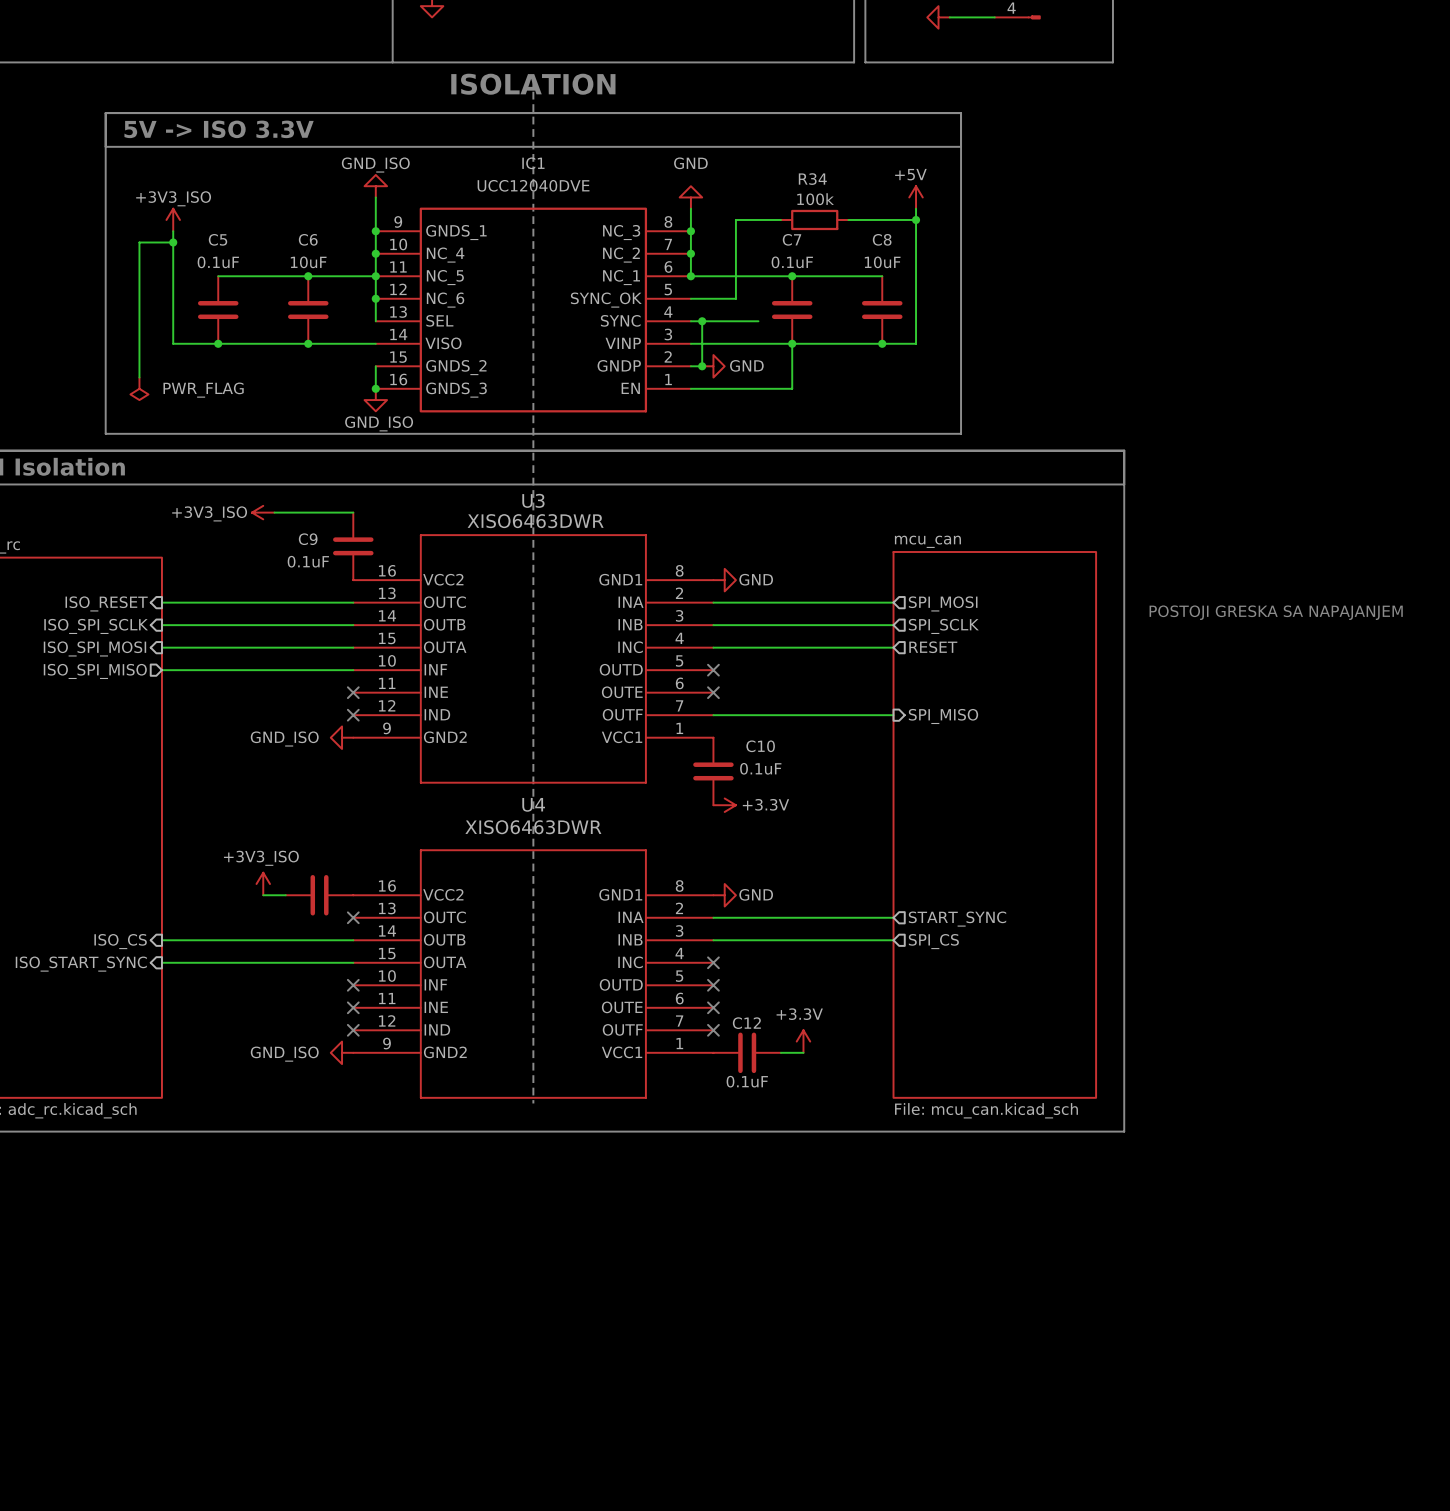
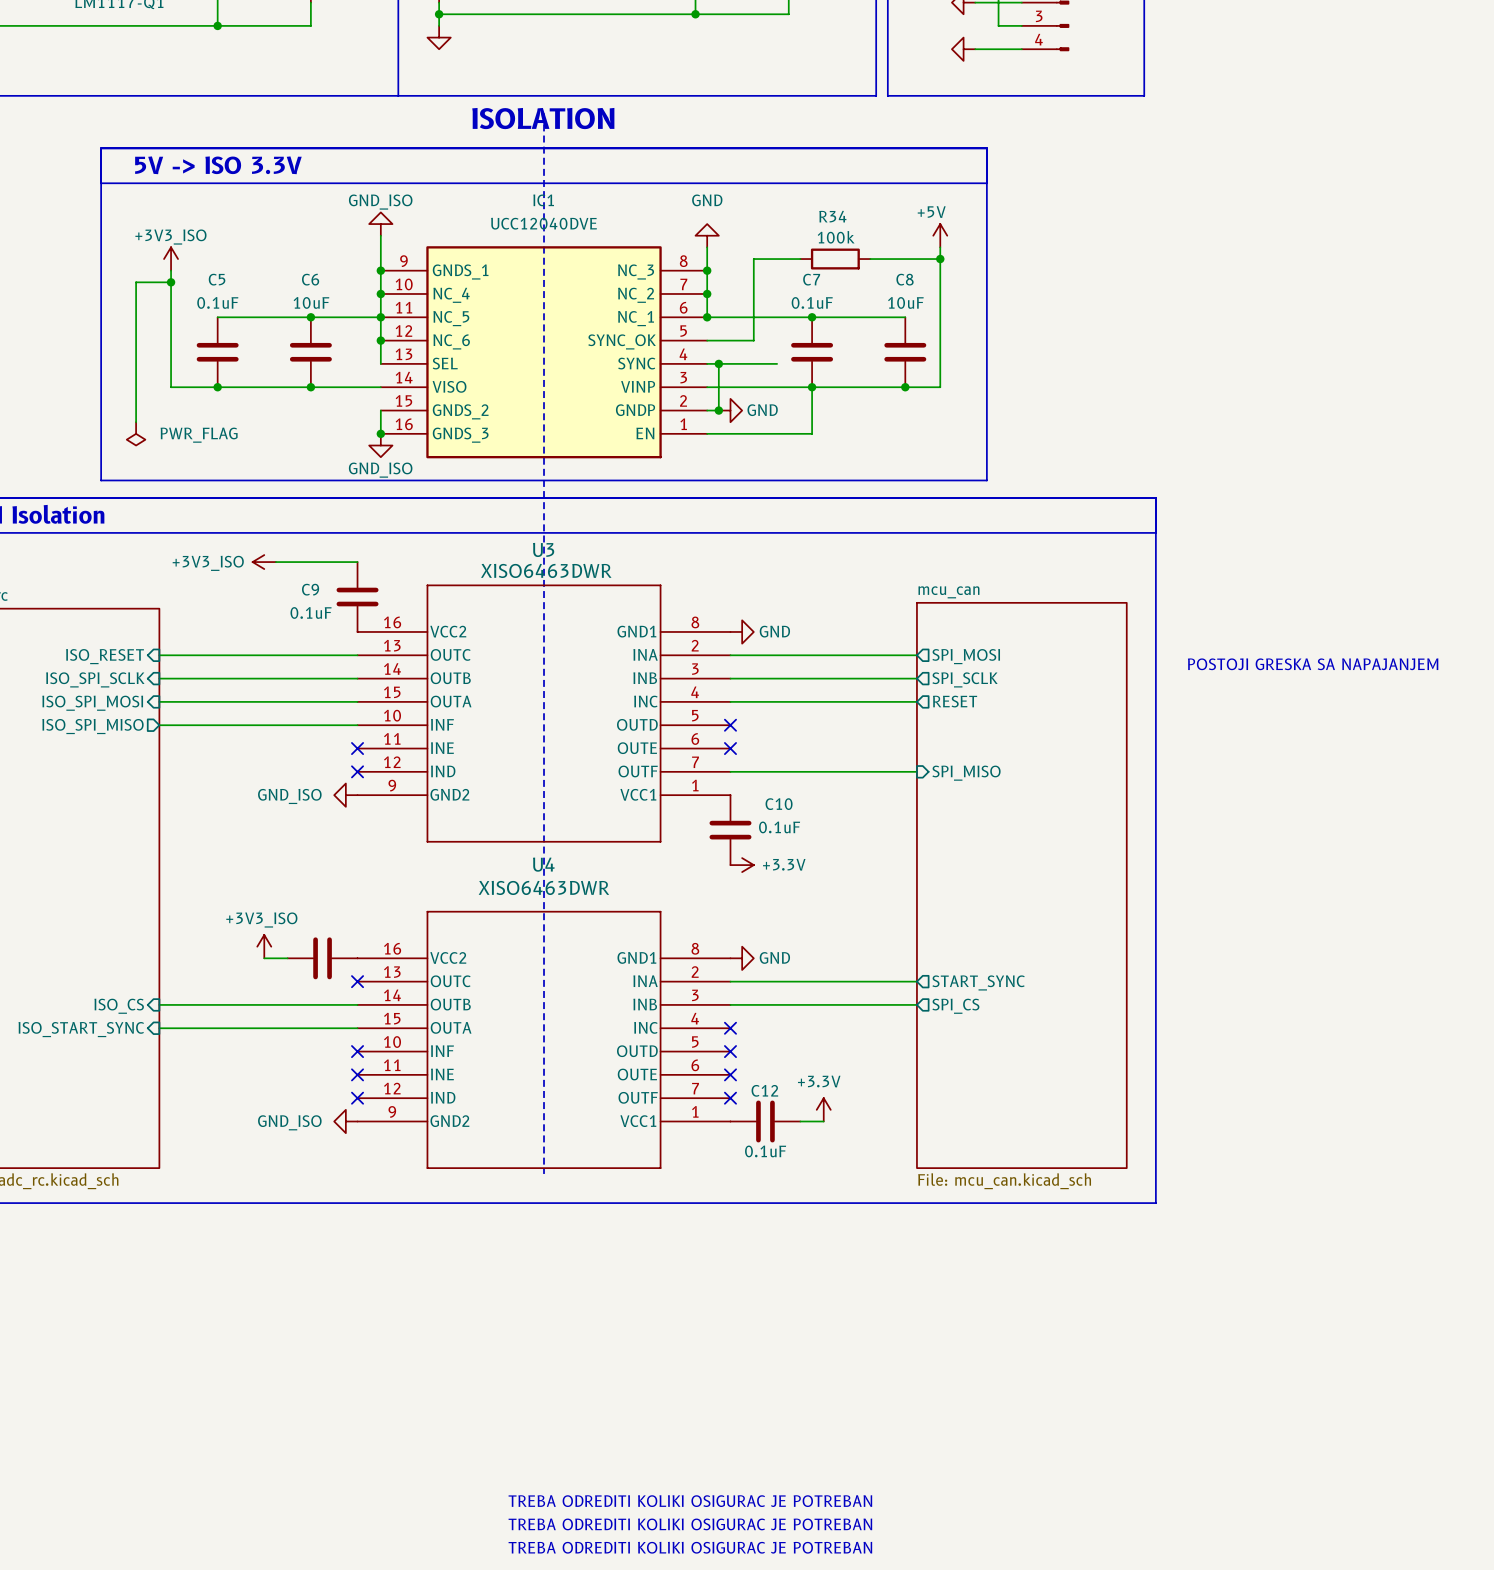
text: none -> TREBA ODREDITI KOLIKI OSIGURAC JE POTREBAN (690, 1501)
text: none -> TREBA ODREDITI KOLIKI OSIGURAC JE POTREBAN (690, 1524)
text: none -> TREBA ODREDITI KOLIKI OSIGURAC JE POTREBAN (690, 1547)

